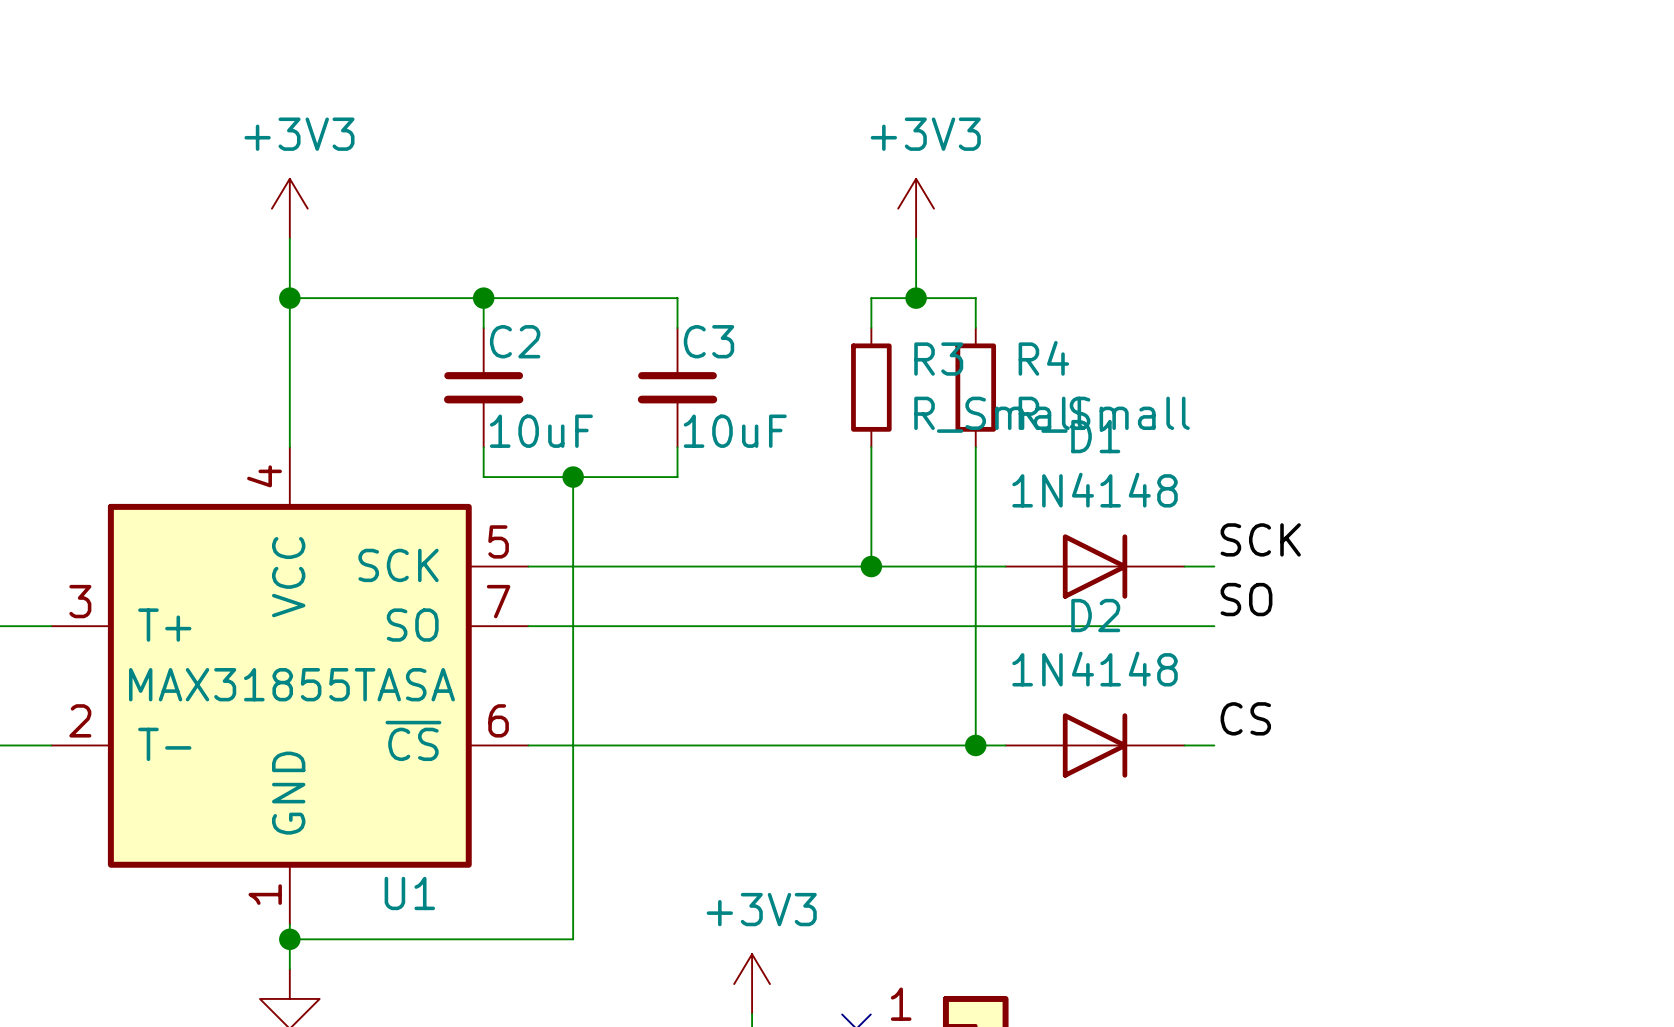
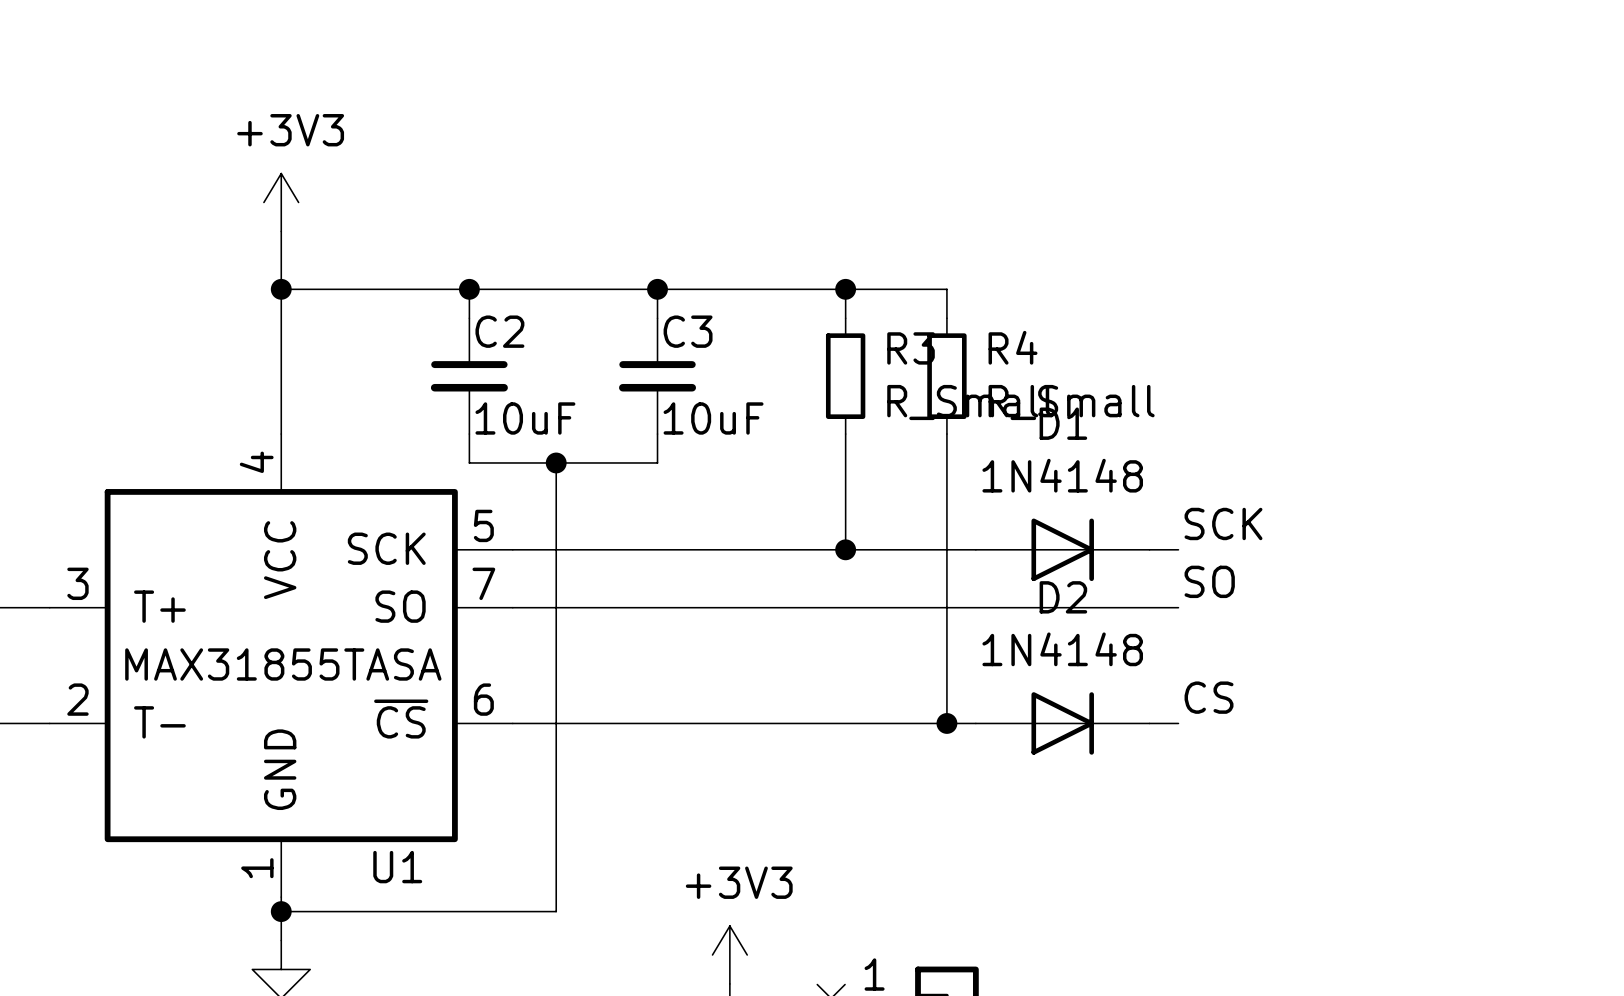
power symbol: +3V3 (916, 208) -> none
wire: (916, 238) (916, 298) -> none
wire: none -> (657, 289) (845, 289)
junction: none -> (657, 289)
junction position: (916, 298) -> (845, 289)

